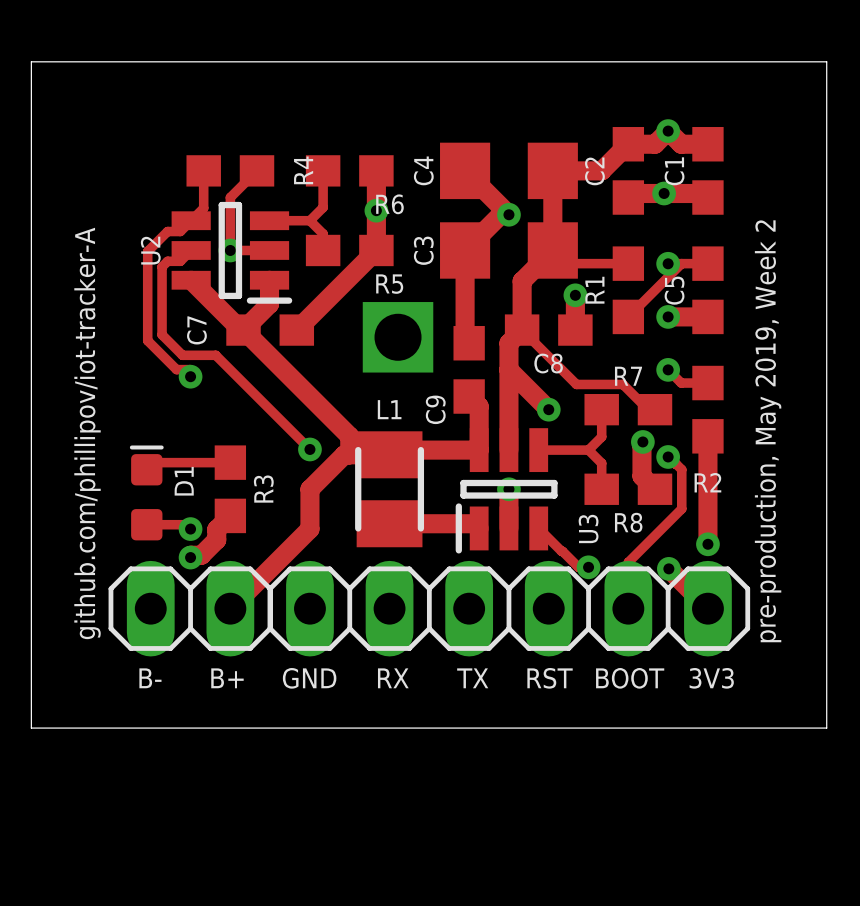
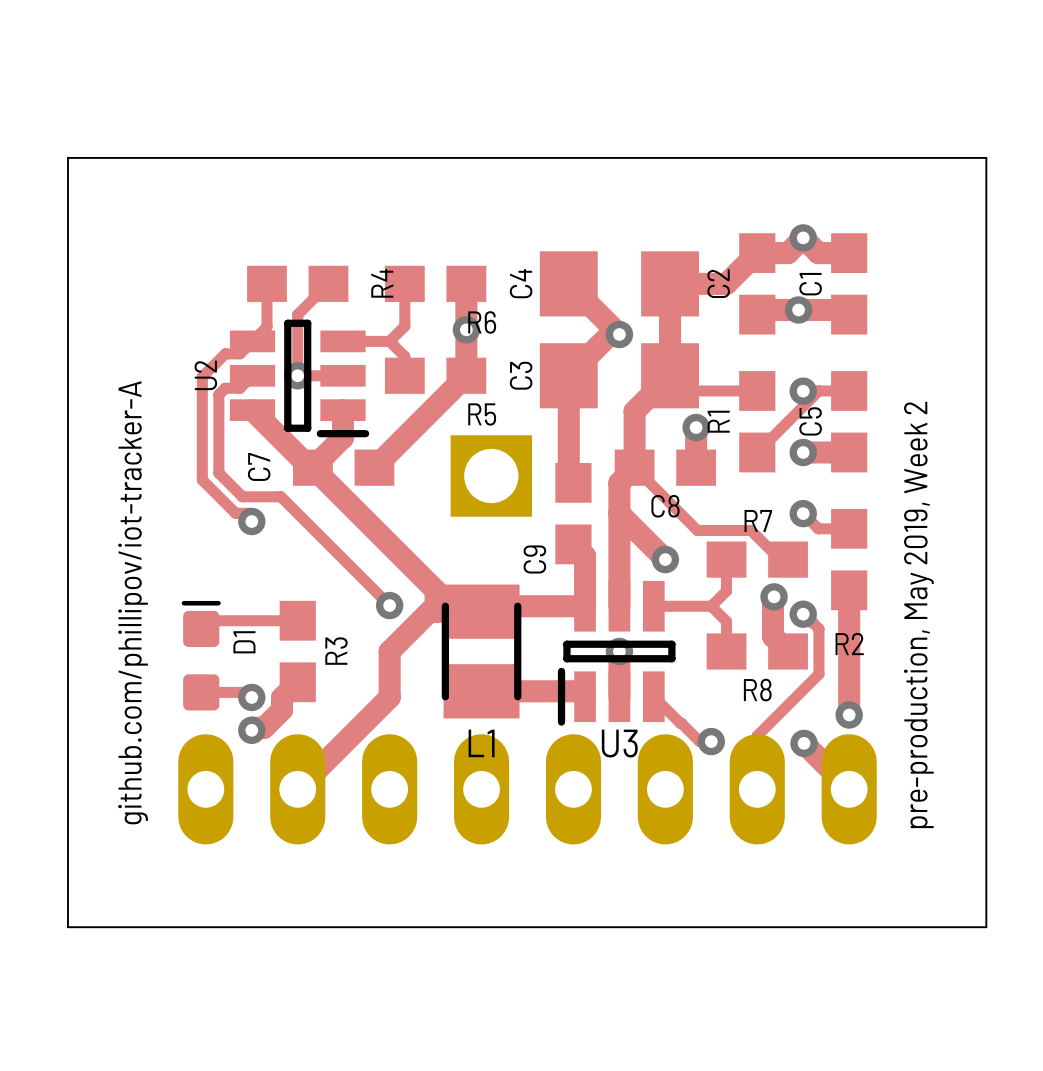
L1 name position: L1 (389, 409) -> L1 (481, 743)
U3 name rotation: 0° (588, 528) -> 90° clockwise (619, 743)
U3 name position: U3 (588, 528) -> U3 (619, 743)
part side: top (190, 608) -> bottom (251, 789)
part side: top (508, 608) -> bottom (619, 789)
text: B- (150, 678) -> none
text: B+ (227, 678) -> none
text: GND (309, 678) -> none
text: RX (393, 678) -> none
text: TX (472, 678) -> none
text: RST (550, 678) -> none
text: BOOT (630, 678) -> none
text: 3V3 (711, 678) -> none

